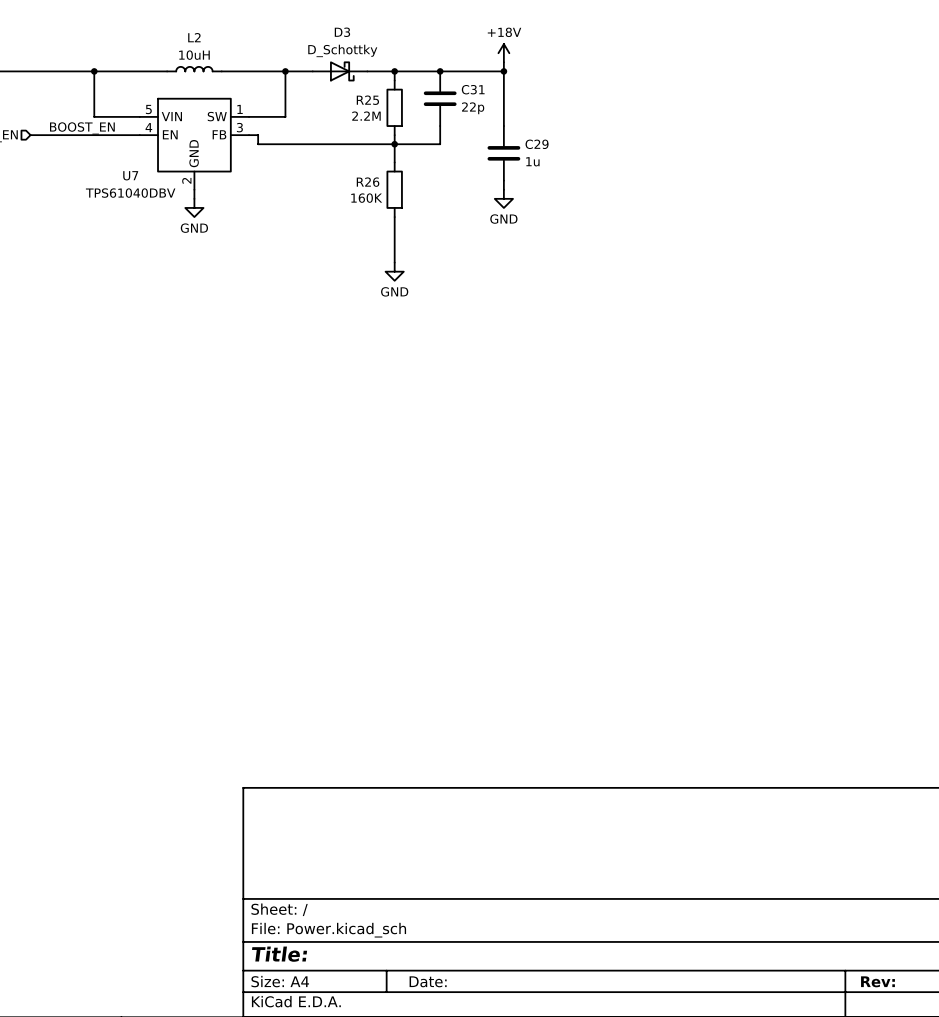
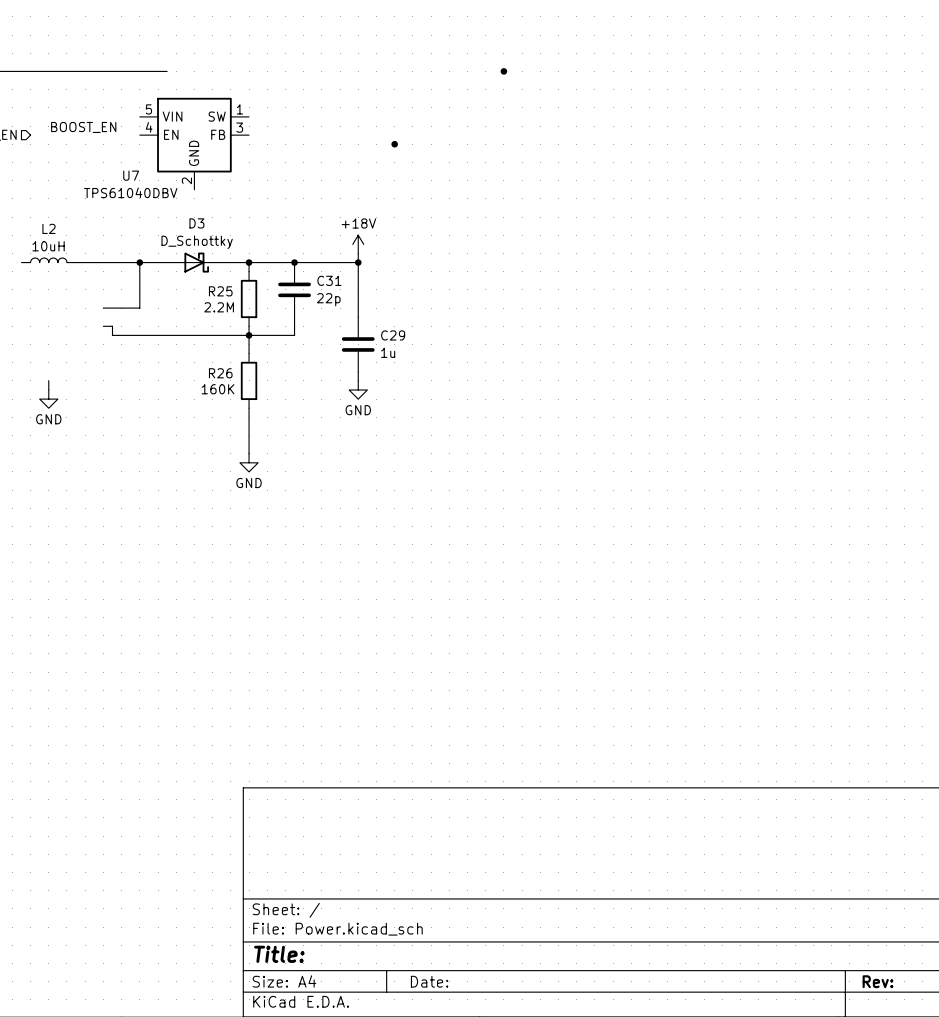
power symbol: +18V (503, 53) -> none
wire: (503, 62) (503, 126) -> none
L2 position: (194, 69) -> (48, 260)
wire: (94, 71) (94, 116) (139, 116) -> none
junction: (94, 71) -> none
wire: (221, 71) (312, 71) -> none
wire: (285, 71) (285, 116) (249, 116) -> none
junction: (285, 71) -> none
D3 position: (340, 71) -> (194, 262)
wire: (367, 71) (503, 71) -> none
wire: (394, 71) (394, 80) -> none
junction: (394, 71) -> none
junction: (440, 71) -> none
C31 position: (440, 98) -> (294, 289)
R25 position: (394, 107) -> (249, 298)
wire: (440, 126) (440, 144) (258, 144) (258, 135) (249, 135) -> none
wire: (30, 135) (139, 135) -> none
wire: (394, 135) (394, 162) -> none
C29 position: (503, 153) -> (358, 344)
wire: (503, 180) (503, 189) -> none
wire: (194, 189) (194, 198) -> (249, 262) (249, 271)
R26 position: (394, 189) -> (249, 380)
power symbol: GND (503, 198) -> none
power symbol: GND (194, 207) -> none
wire: (394, 217) (394, 262) -> none
power symbol: none -> +18V (358, 244)
wire: none -> (358, 253) (358, 317)
wire: none -> (76, 262) (167, 262)
wire: none -> (139, 262) (139, 308) (103, 308)
junction: none -> (139, 262)
wire: none -> (221, 262) (358, 262)
junction: none -> (249, 262)
junction: none -> (294, 262)
junction: none -> (358, 262)
power symbol: GND (394, 271) -> none
wire: none -> (294, 317) (294, 335) (112, 335) (112, 326) (103, 326)
wire: none -> (249, 326) (249, 353)
junction: none -> (249, 335)
wire: none -> (358, 371) (358, 380)
wire: none -> (48, 380) (48, 390)
power symbol: none -> GND (358, 390)
power symbol: none -> GND (48, 399)
wire: none -> (249, 408) (249, 453)
power symbol: none -> GND (249, 462)

